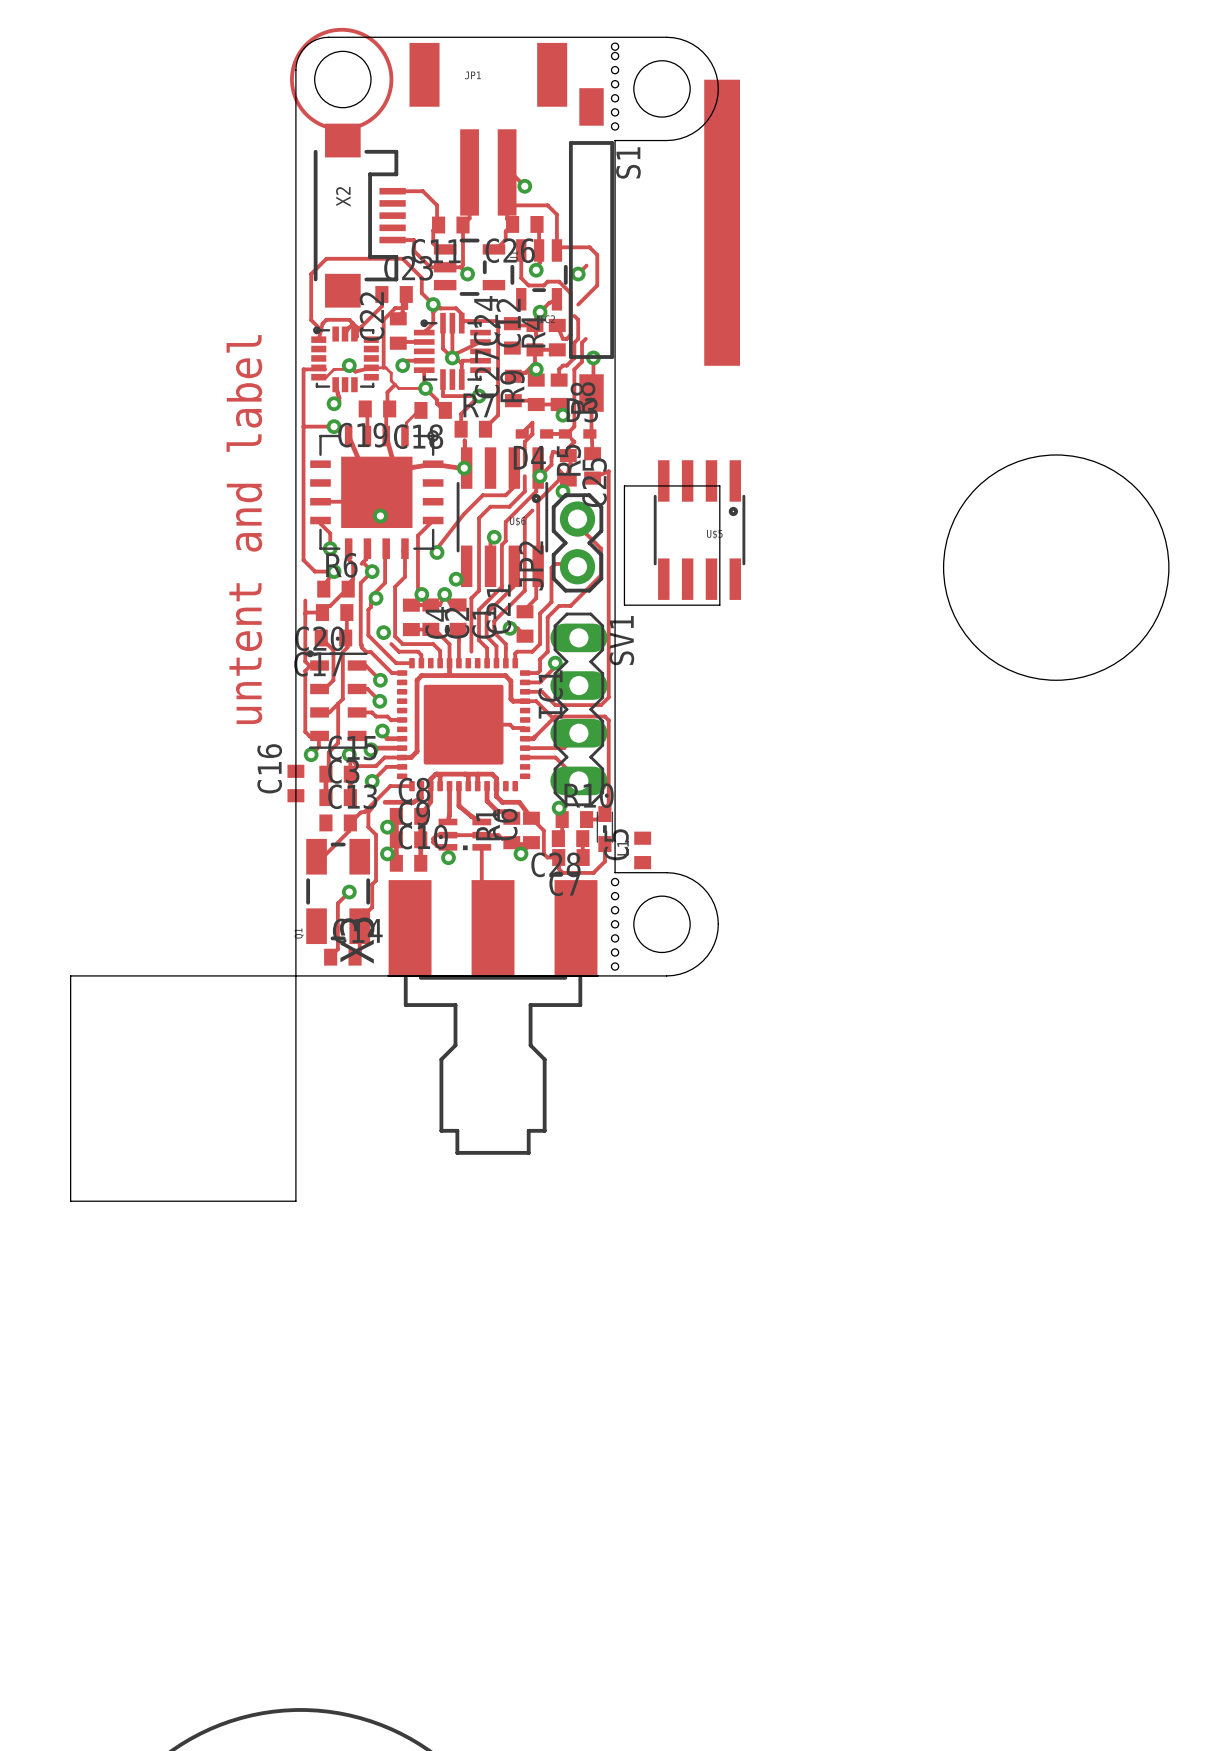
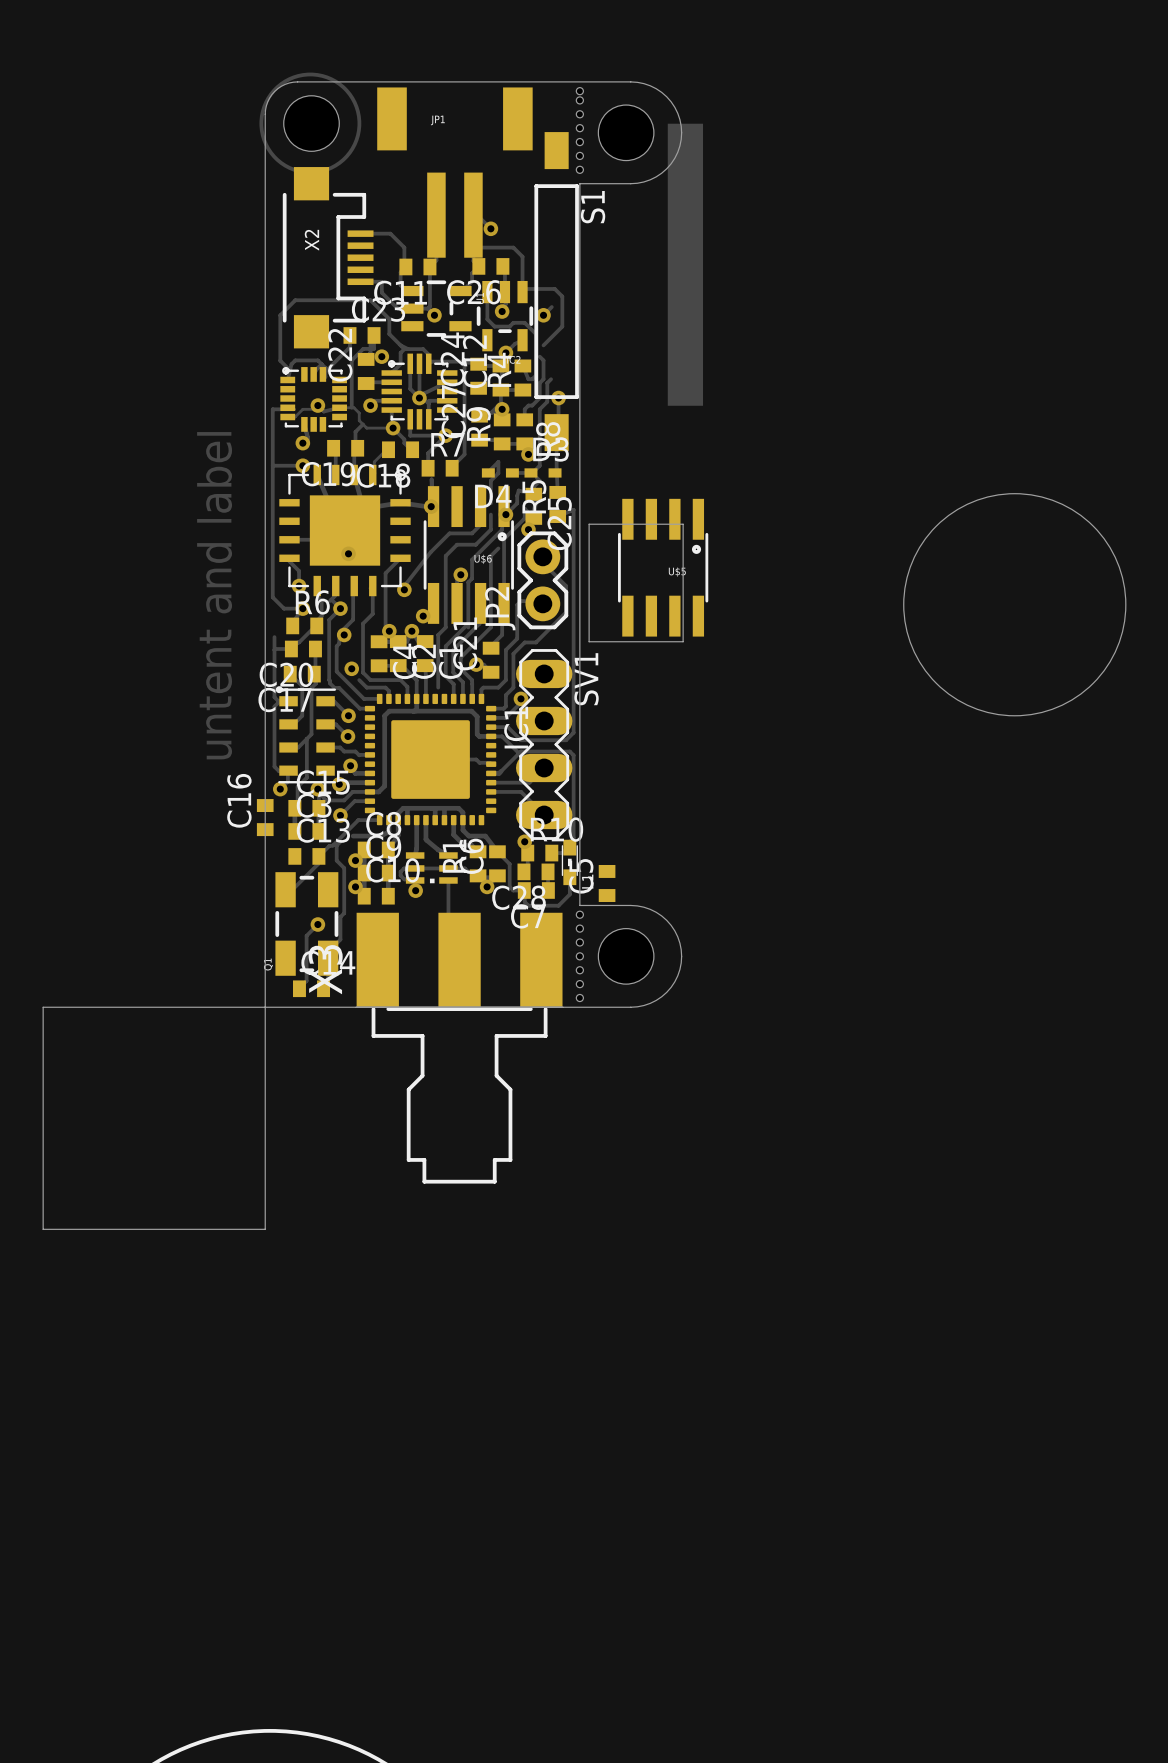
via position: (433, 304) -> (381, 356)

